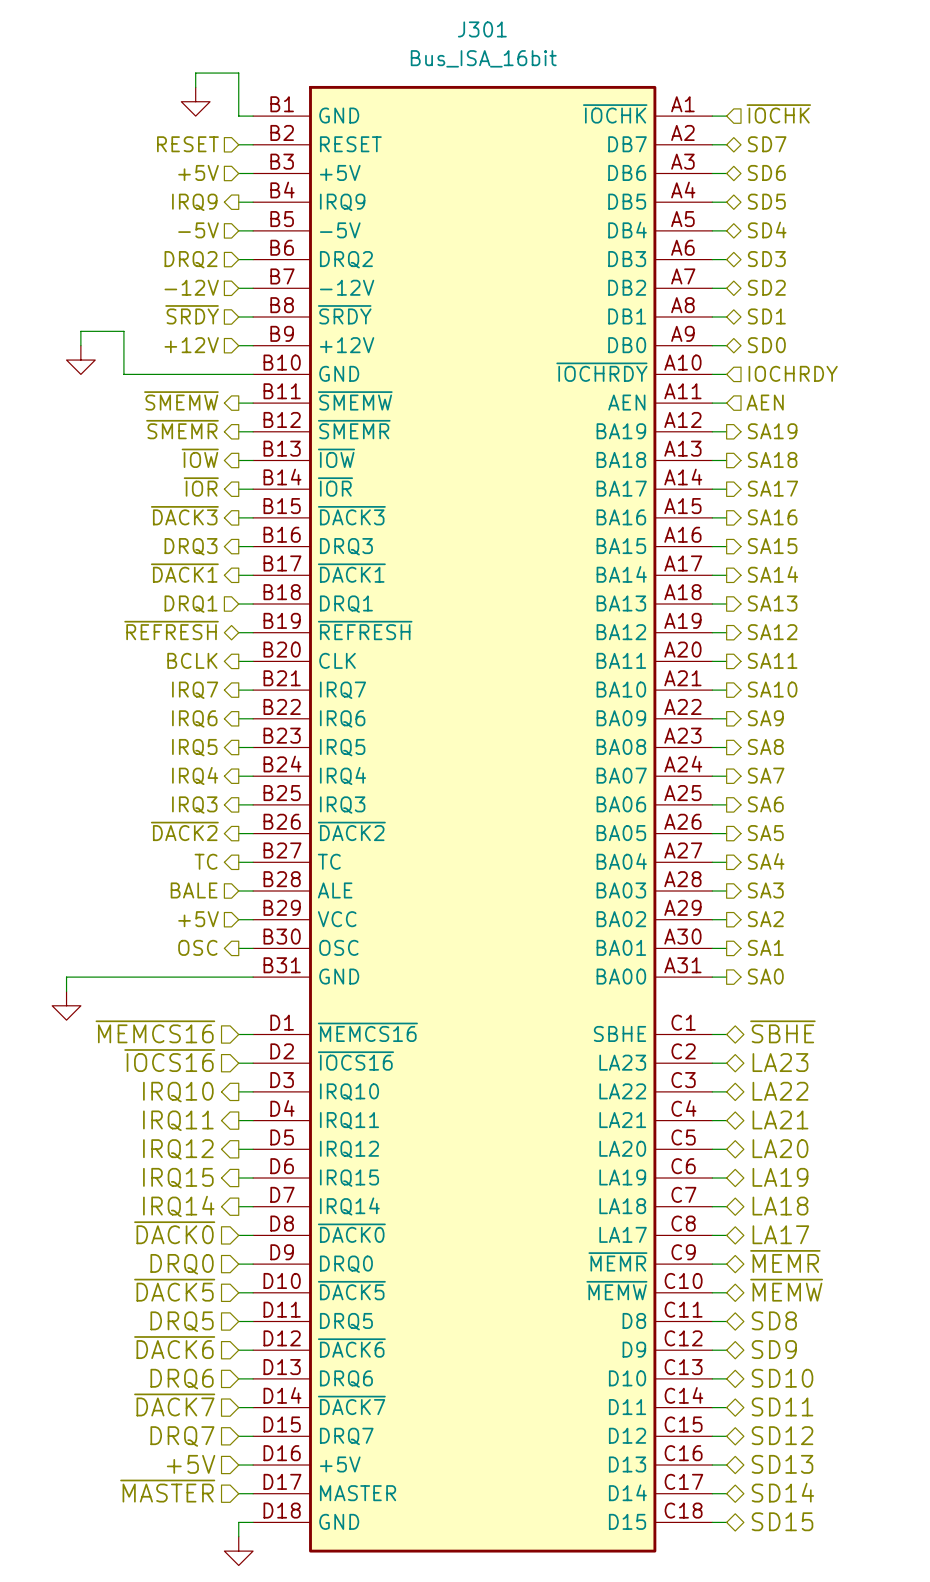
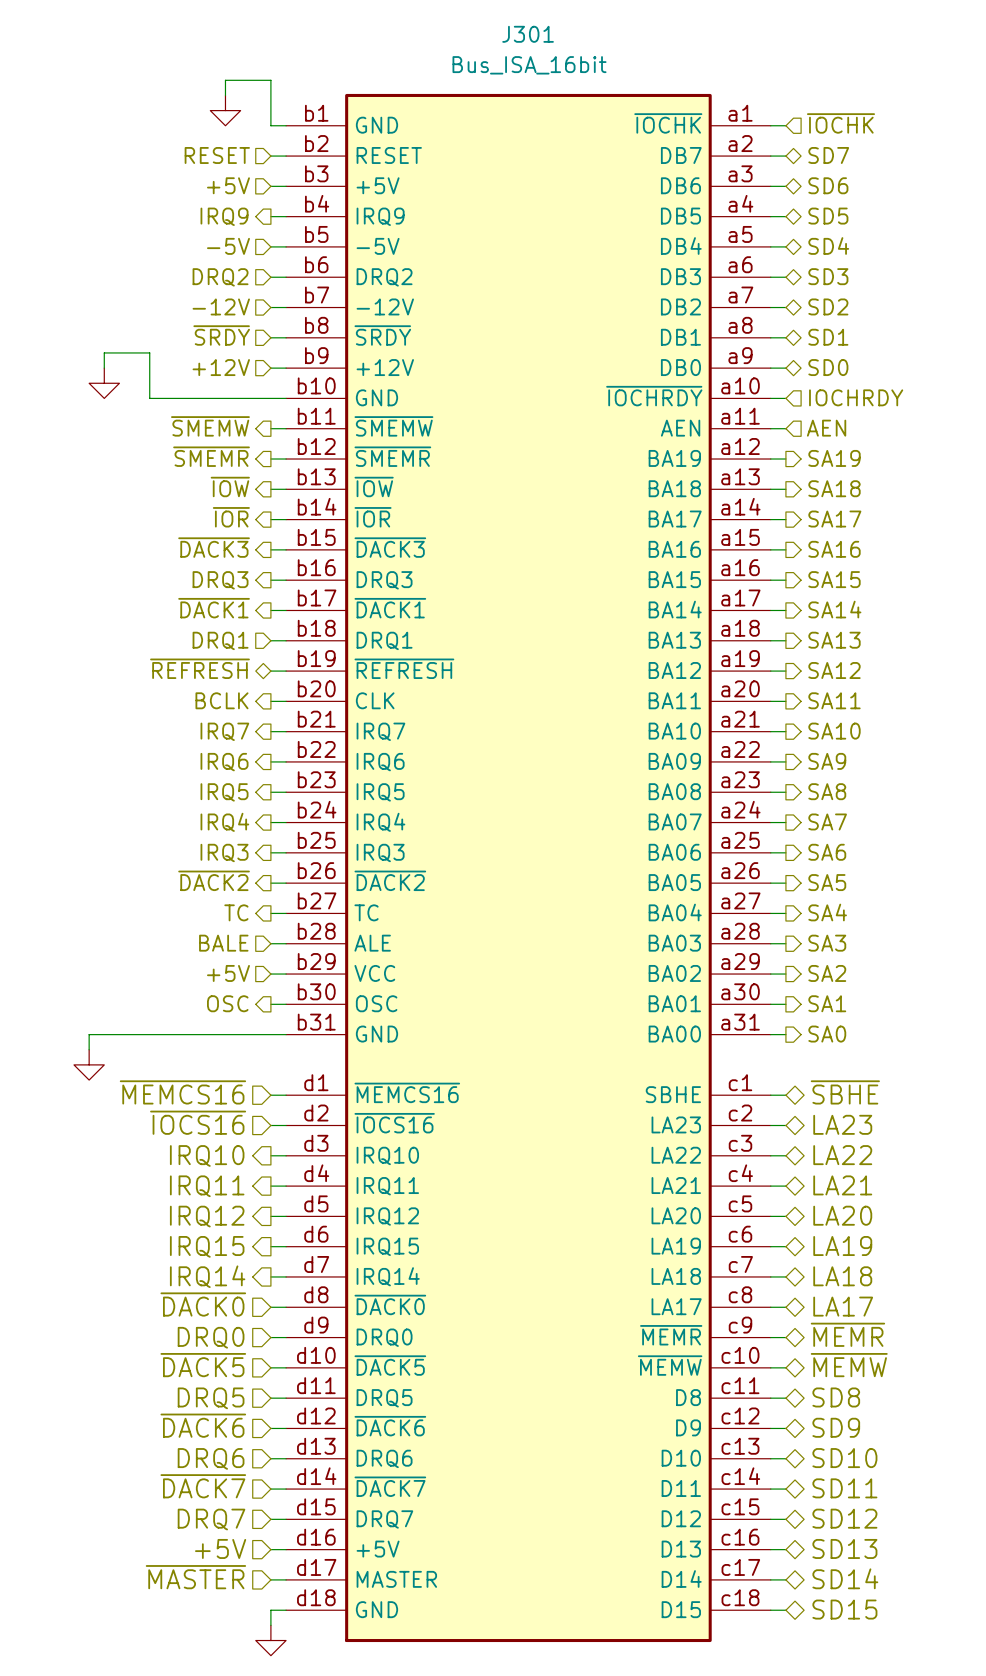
J301 symbol: [253, 85, 713, 1553] -> [286, 93, 771, 1643]

